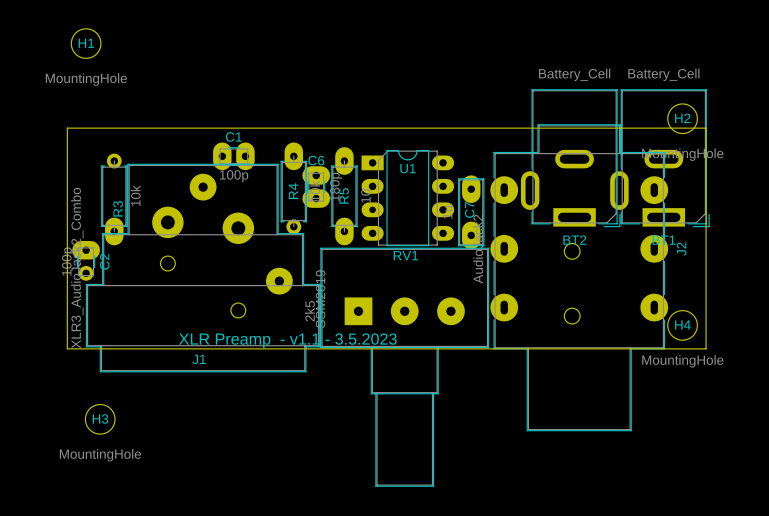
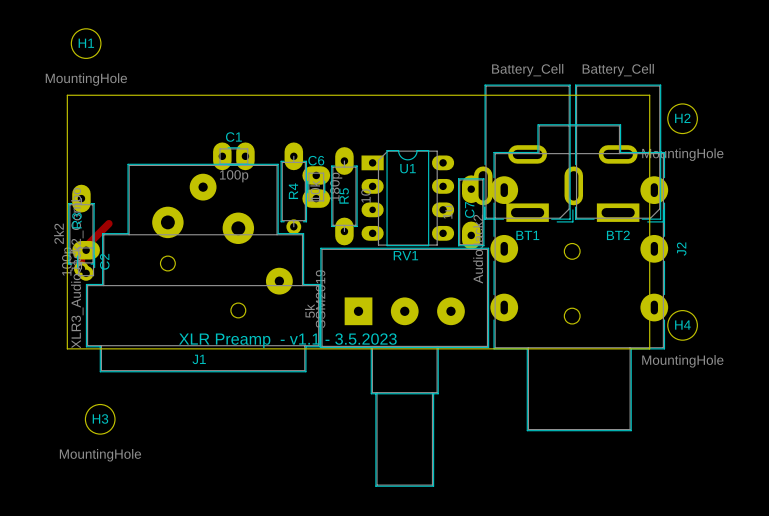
board edge: (67, 128) (706, 128) (706, 348) (649, 348) -> (67, 128) (67, 95) (649, 95) (649, 348)
BT2 position: (570, 158) -> (614, 153)
BT1 position: (659, 158) -> (523, 153)
R3 value: 10k (135, 195) -> 2k2 (58, 233)
R3 rotation: 0° (114, 199) -> 180° (81, 230)
track: none -> (108, 223) (81, 251) (81, 269)
RV1 value: 2k5 (309, 311) -> 5k (309, 311)

